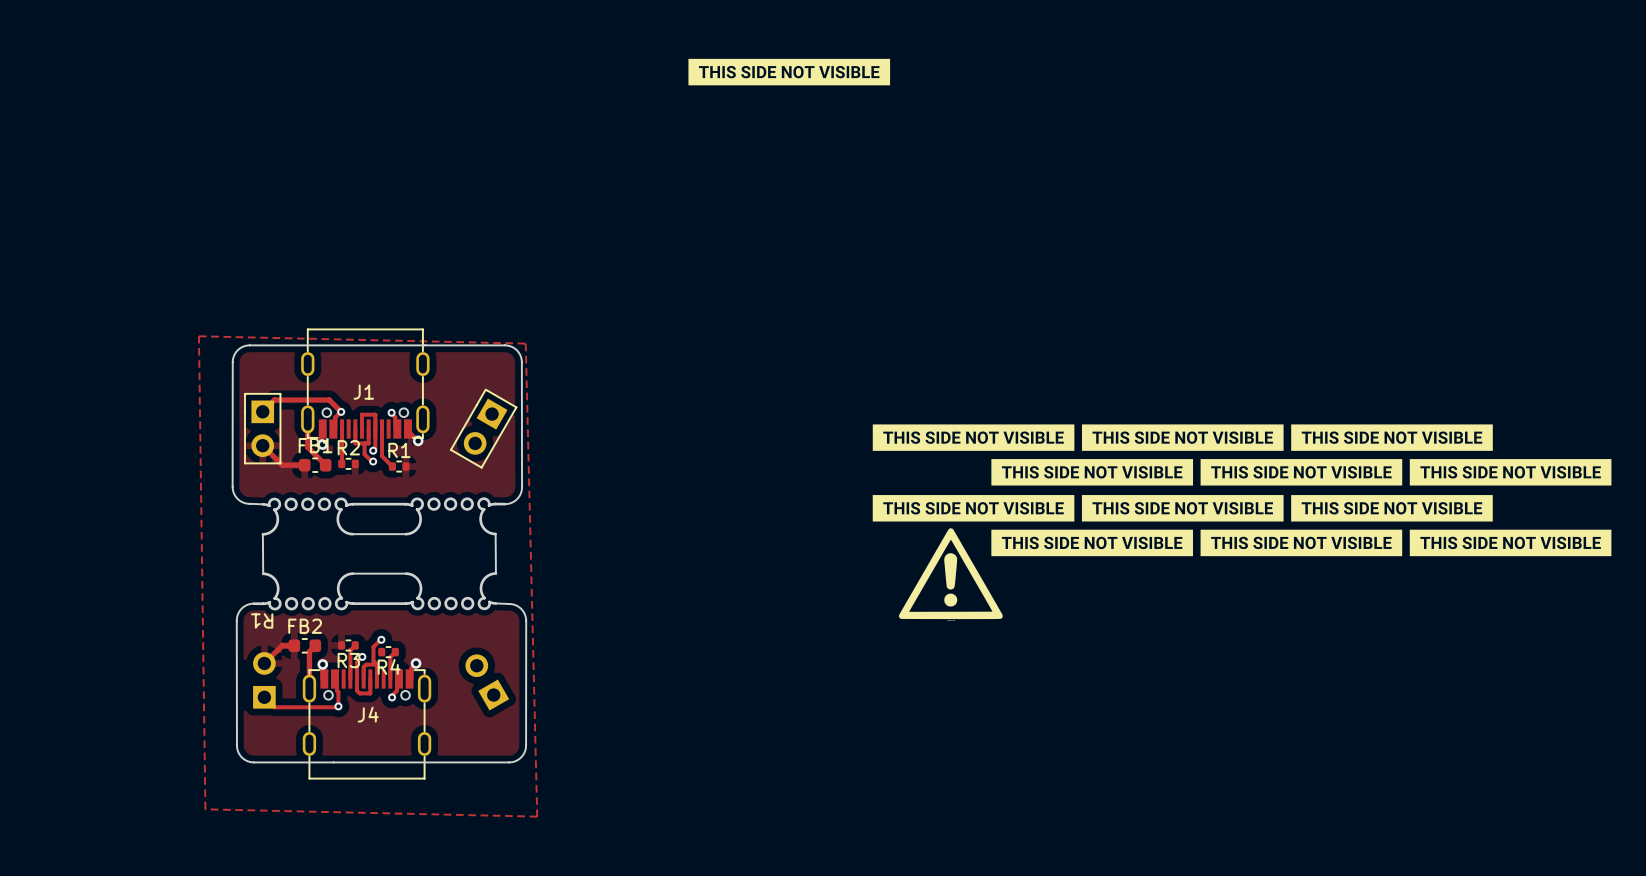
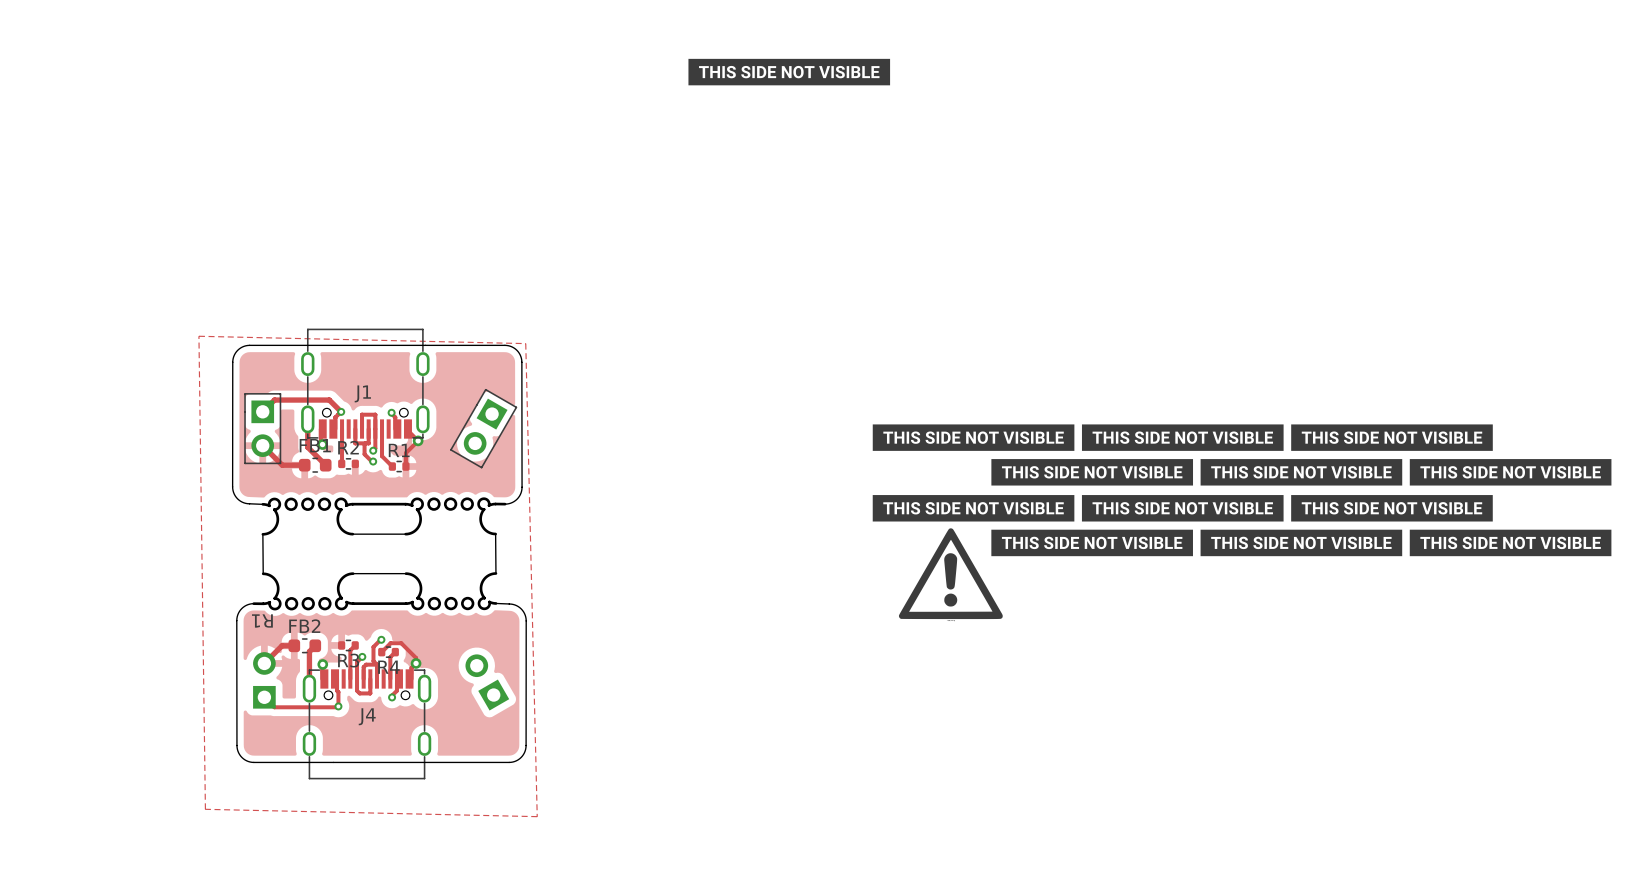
track: none -> (418, 440) (405, 453) (405, 466)
track: none -> (381, 652) (390, 643) (401, 643) (416, 657) (416, 663)

